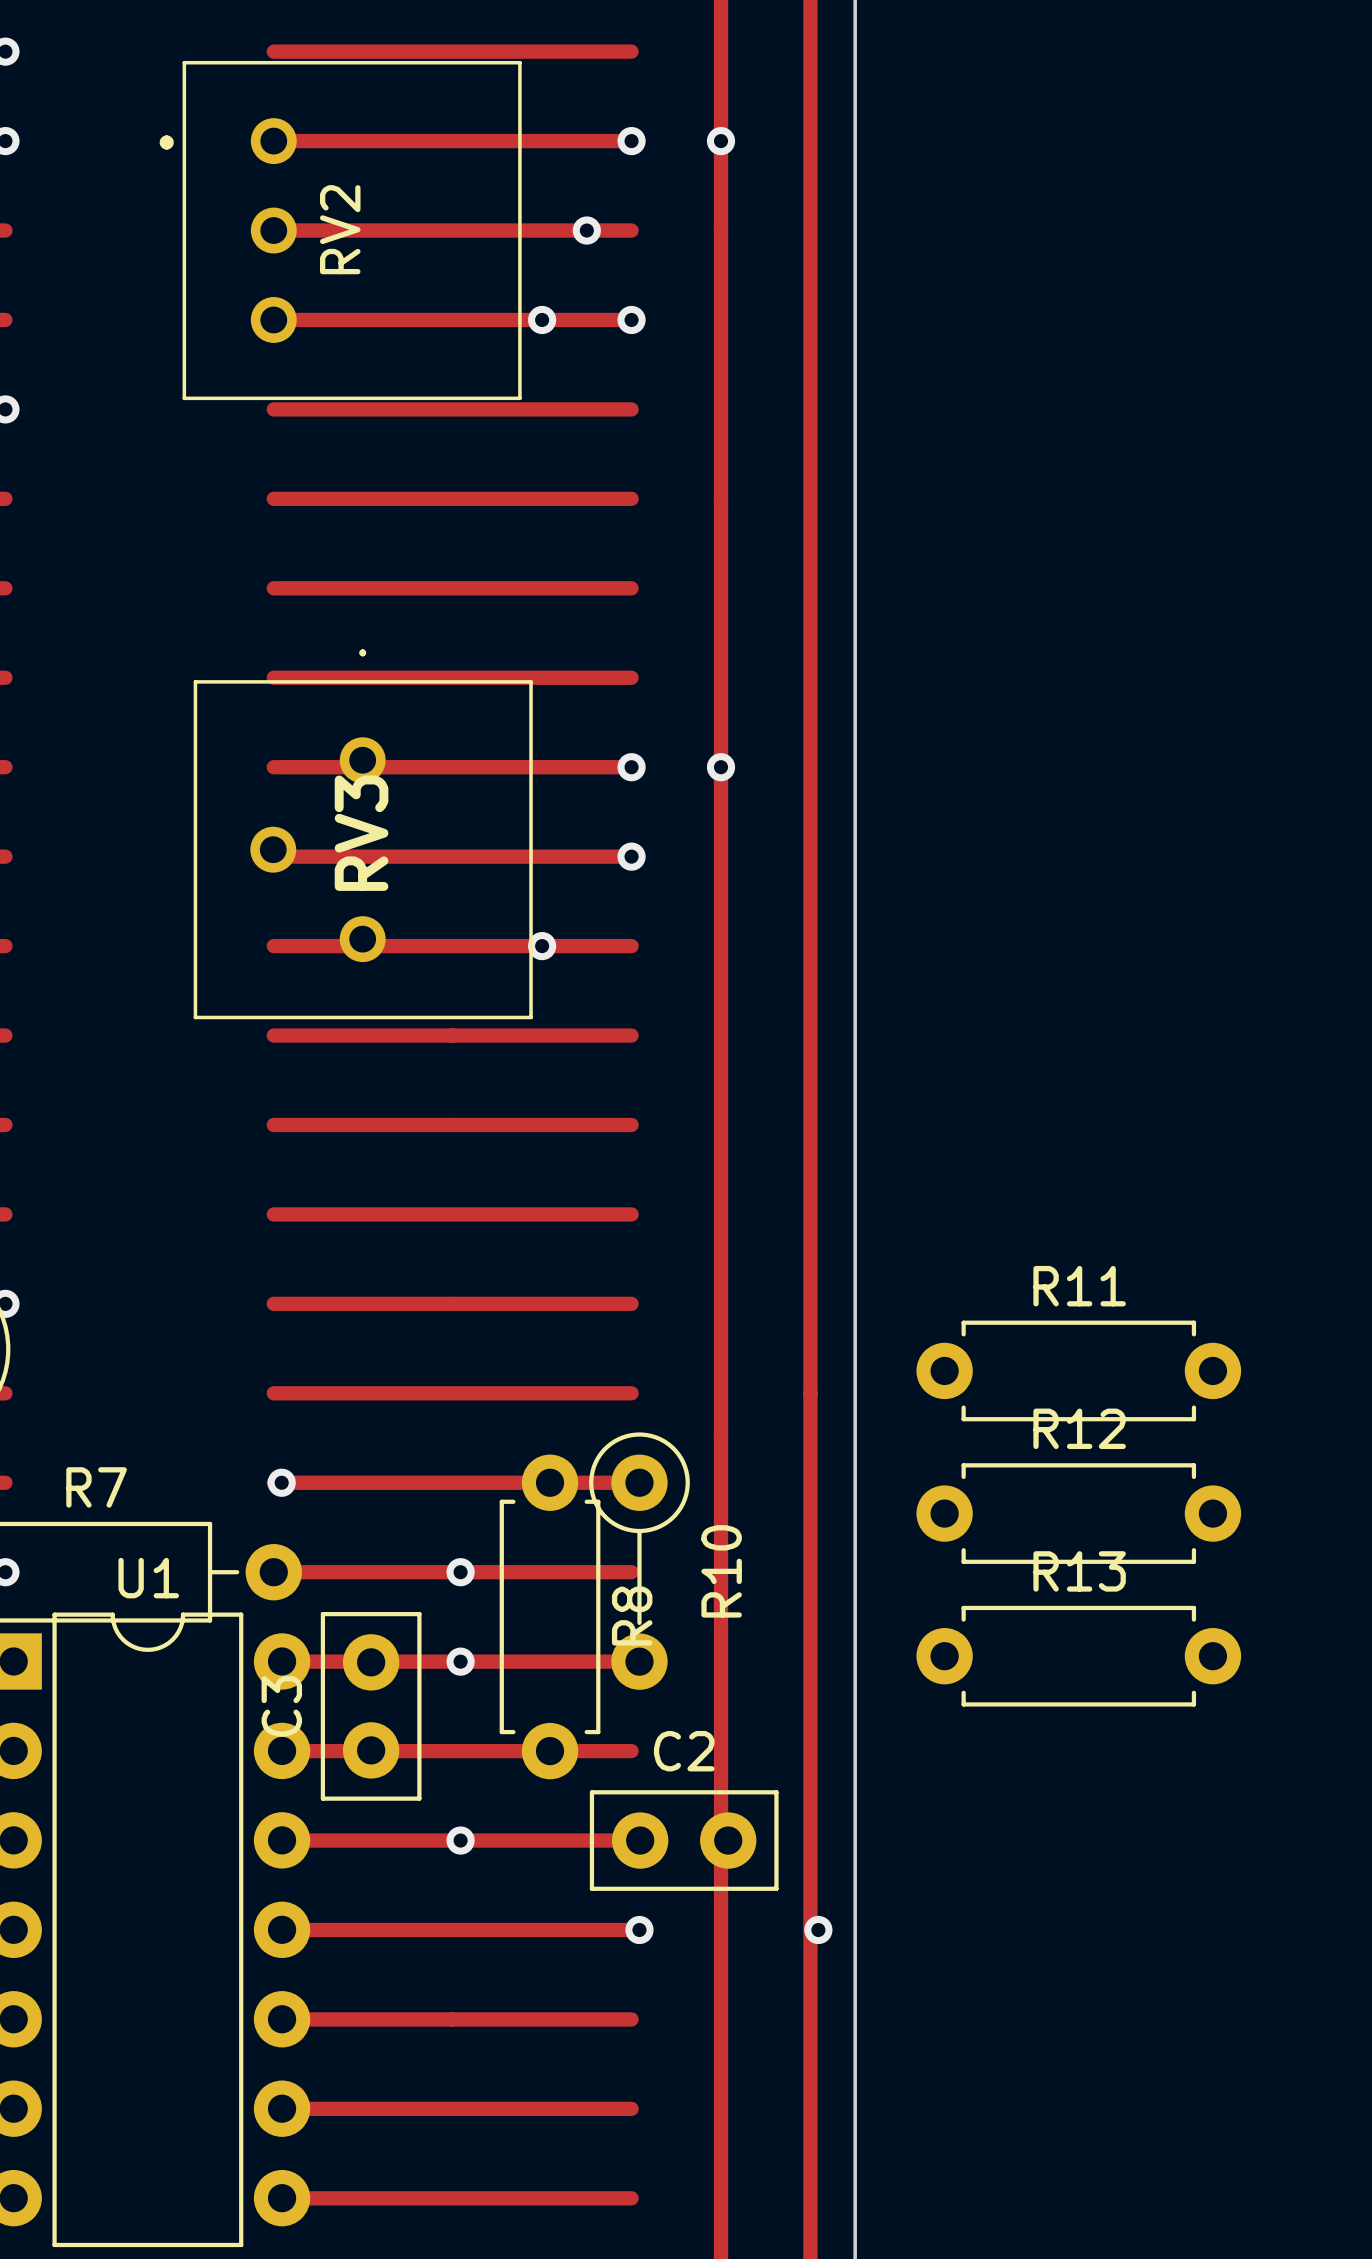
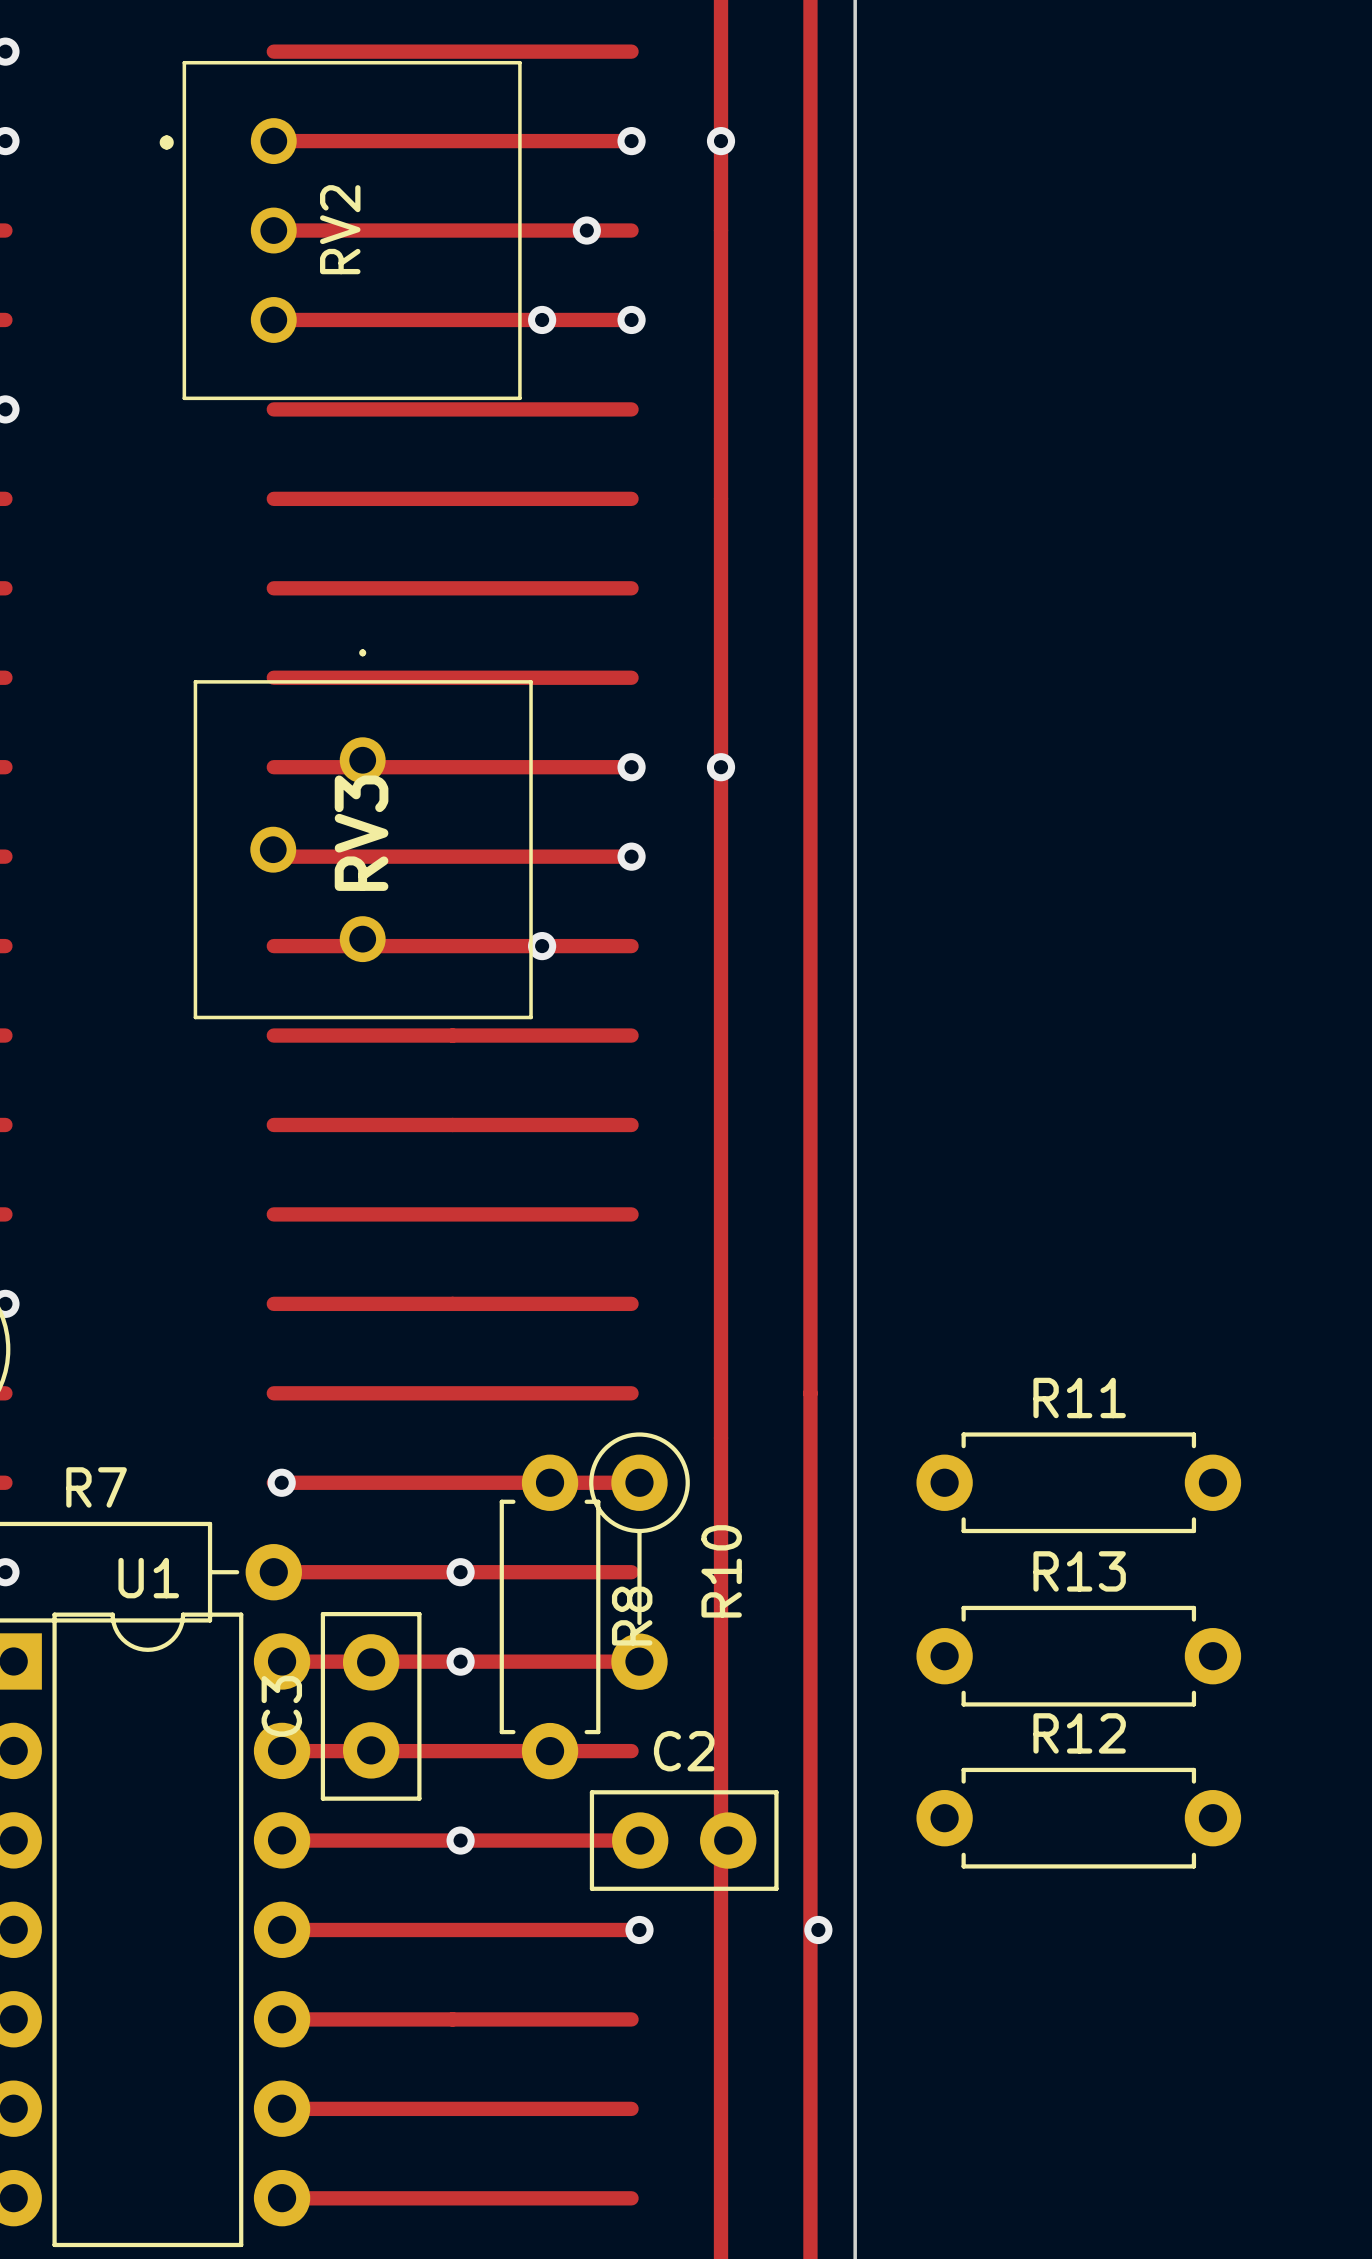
R11 position: (1078, 1370) -> (1078, 1482)
R12 position: (1078, 1513) -> (1078, 1818)

